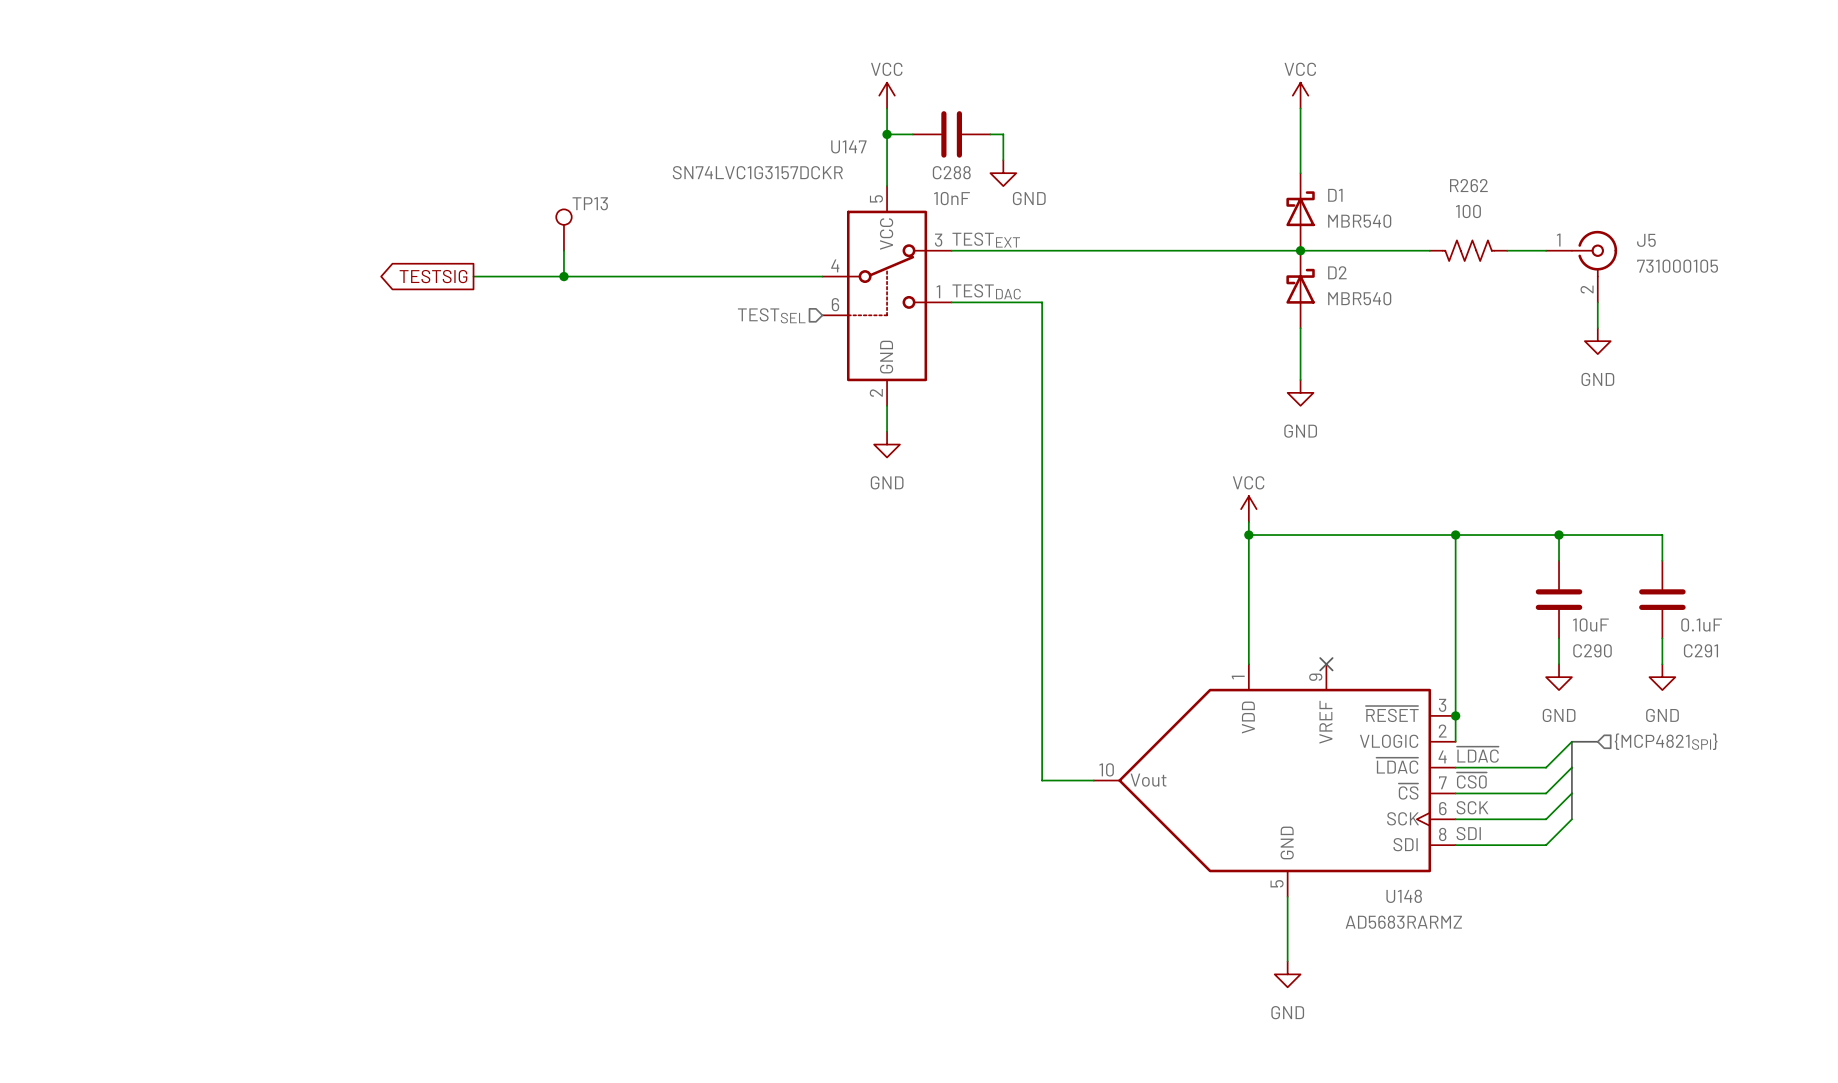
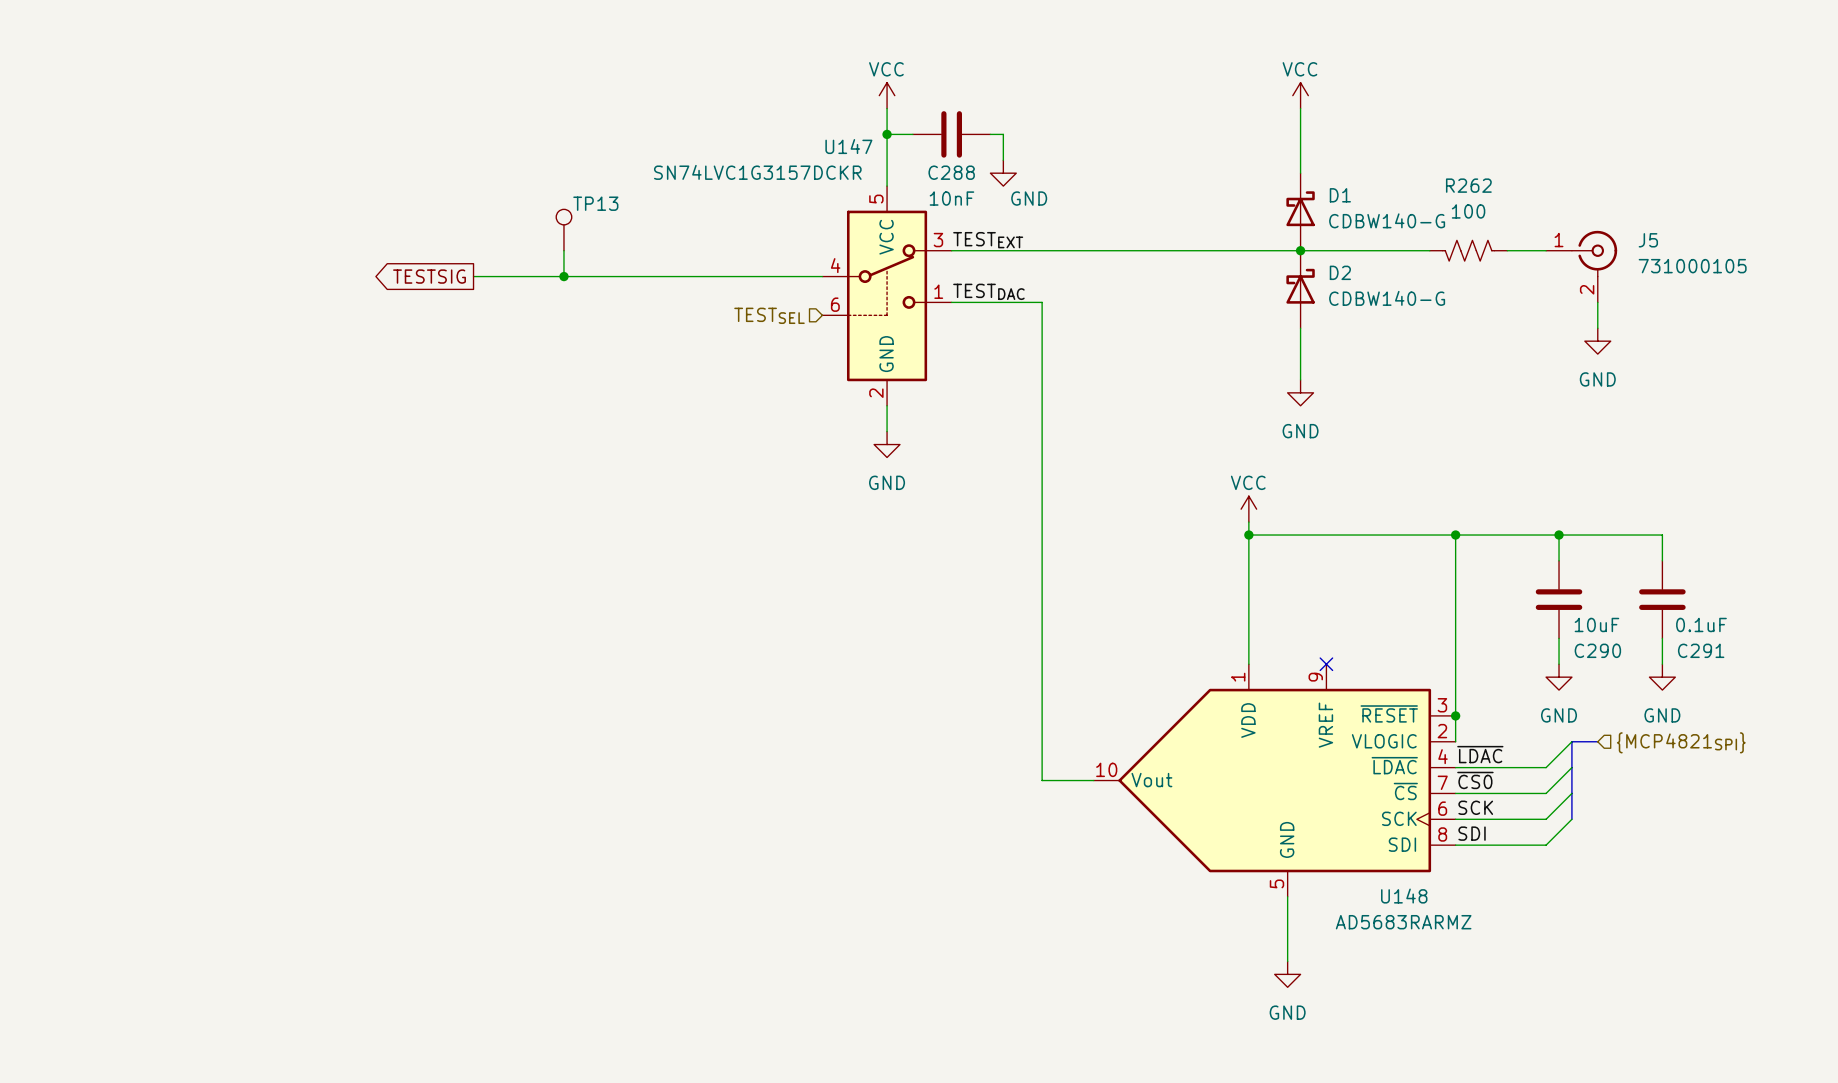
D1 value: MBR540 (1359, 221) -> CDBW140-G (1387, 220)
D2 value: MBR540 (1359, 298) -> CDBW140-G (1387, 298)

